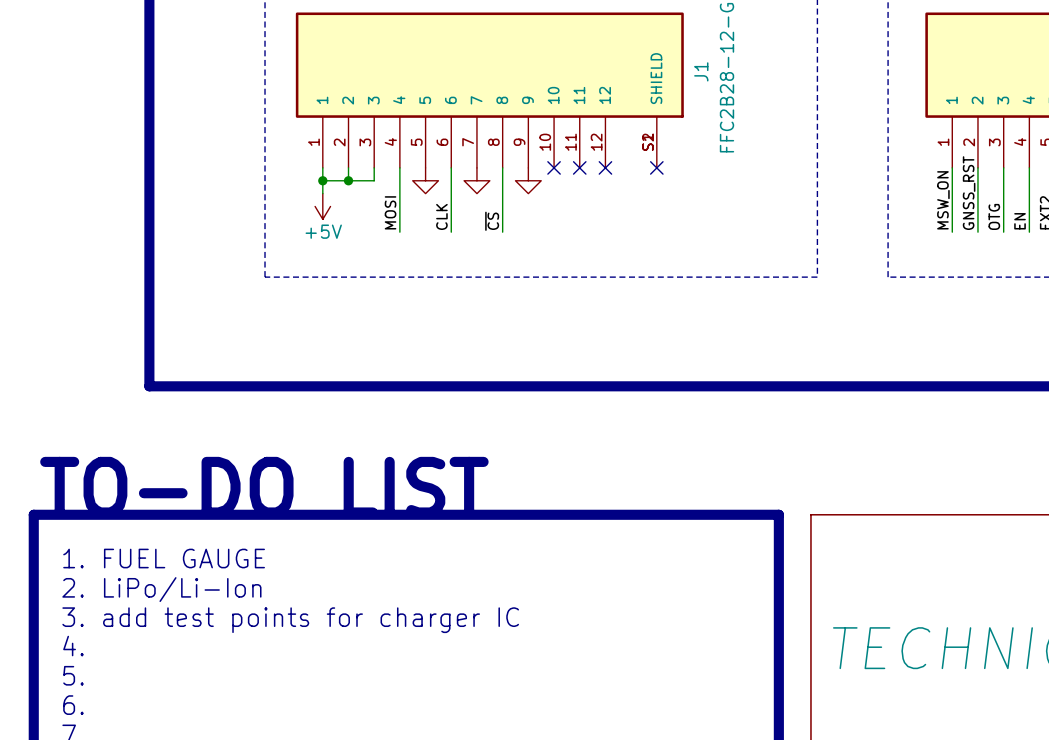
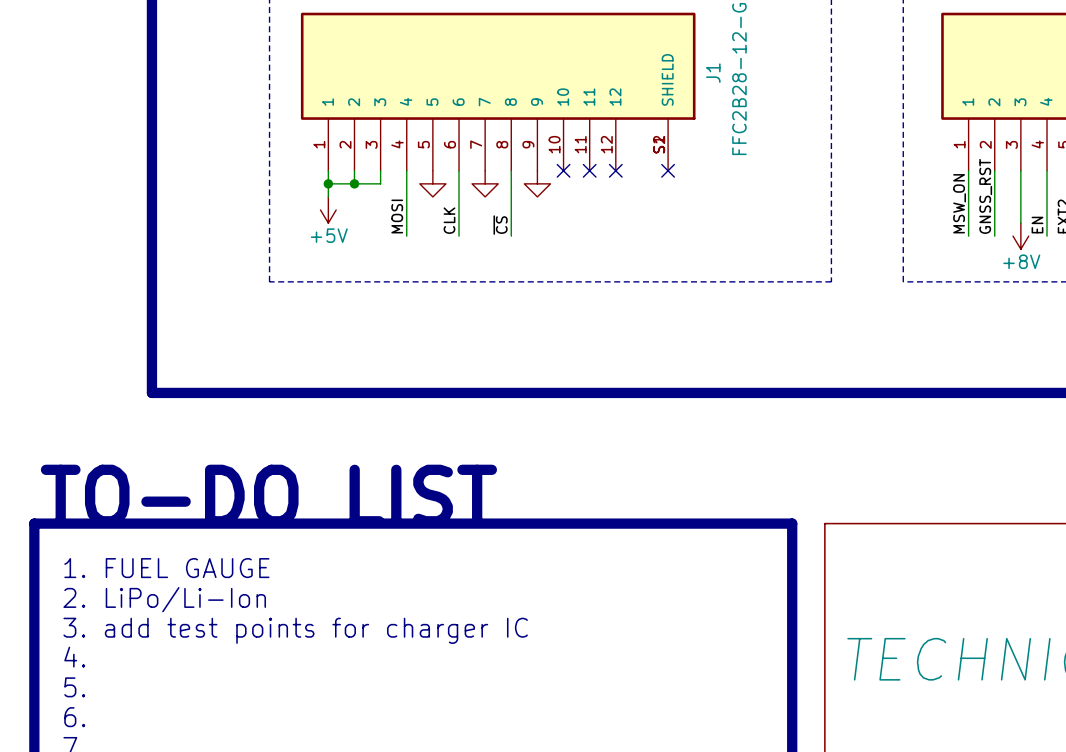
label: OTG (994, 216) -> none
power symbol: none -> +8V (1020, 236)

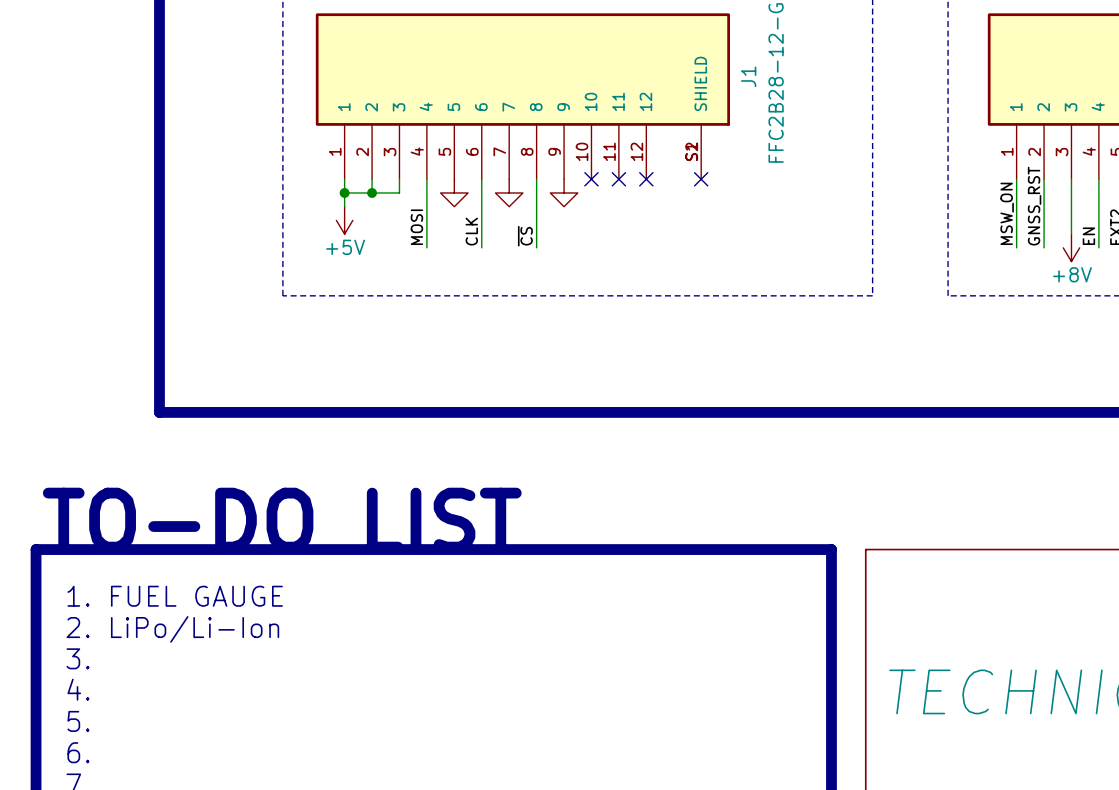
text: 3. add test points for charger IC (295, 630) -> 3. (77, 658)

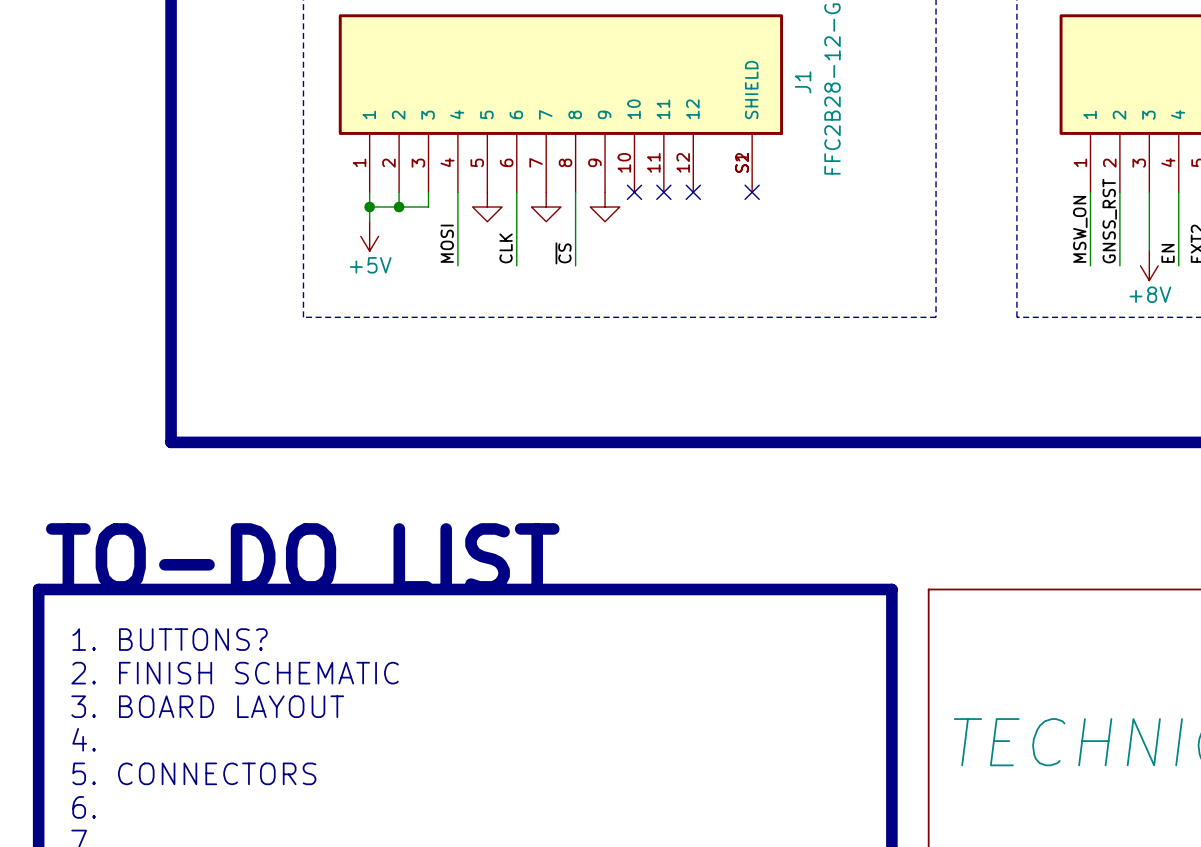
text: 1. FUEL GAUGE (175, 596) -> 1. BUTTONS? (170, 639)
text: 2. LiPo/Li-Ion (172, 629) -> 2. FINISH SCHEMATIC (235, 673)
text: 3. (77, 658) -> 3. BOARD LAYOUT (207, 706)
text: 5. (78, 721) -> 5. CONNECTORS (194, 773)

